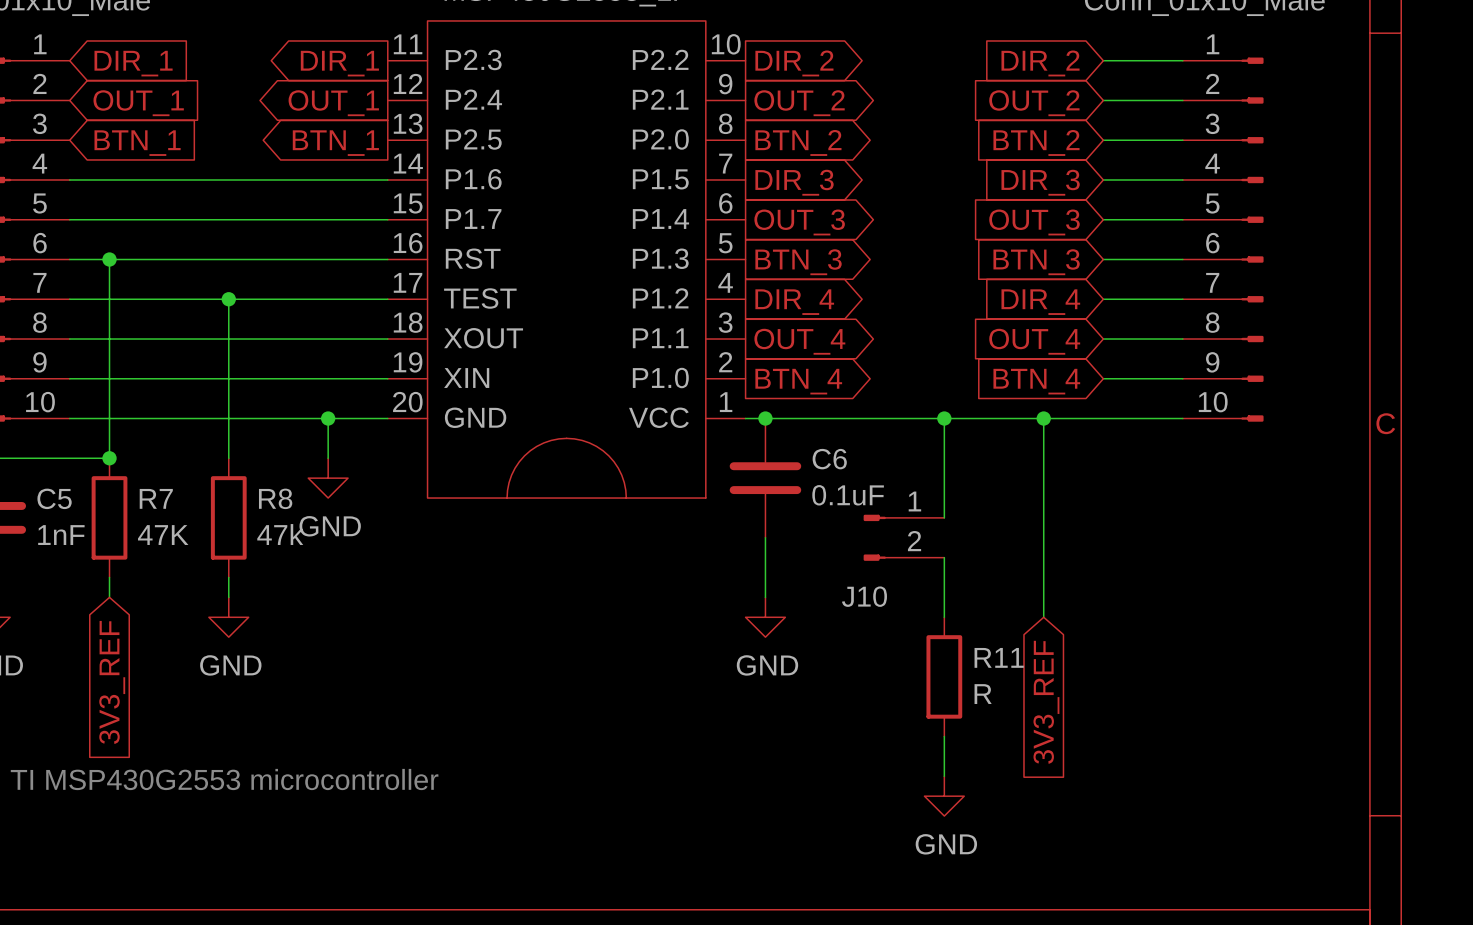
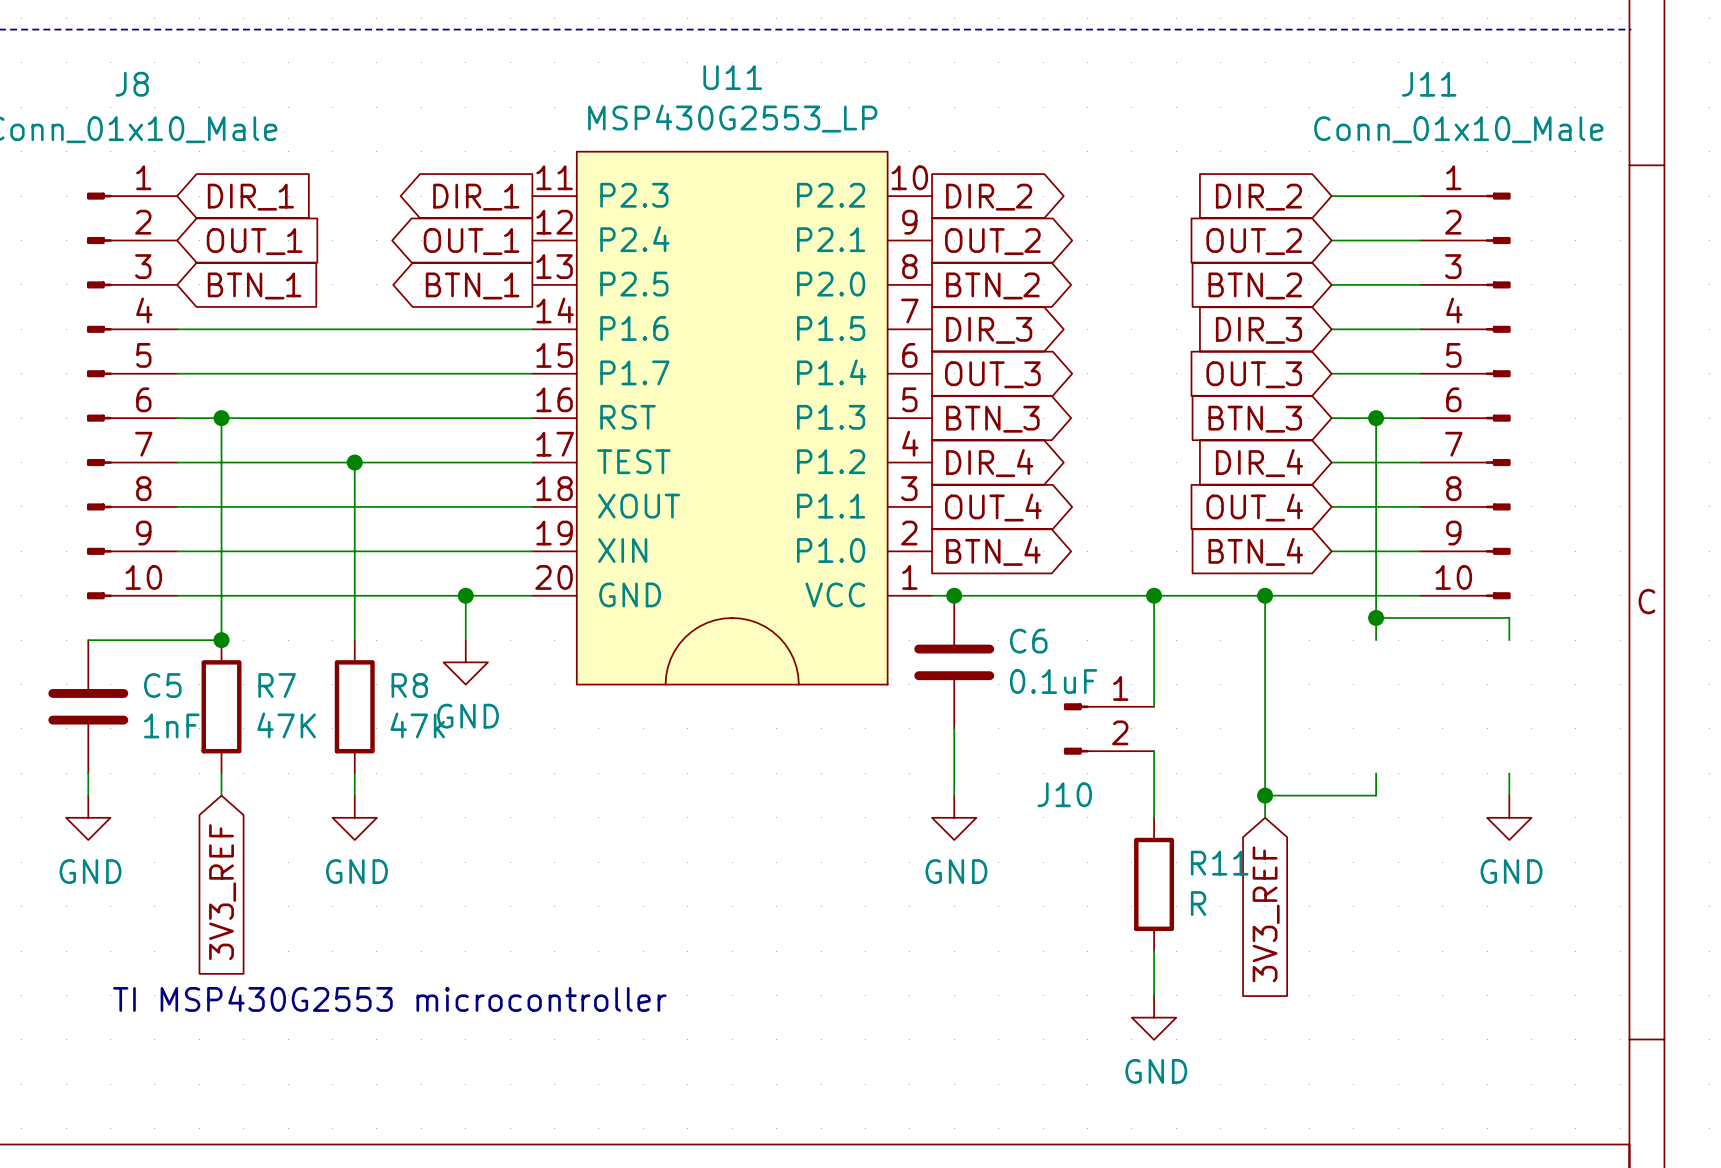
wire: none -> (1376, 418) (1376, 640)
junction: none -> (1376, 418)
wire: none -> (1376, 617) (1509, 617) (1509, 640)
junction: none -> (1376, 617)
wire: none -> (1376, 773) (1376, 795) (1265, 795)
wire: none -> (1509, 773) (1509, 795)
junction: none -> (1265, 795)
power symbol: none -> GND (1509, 817)

